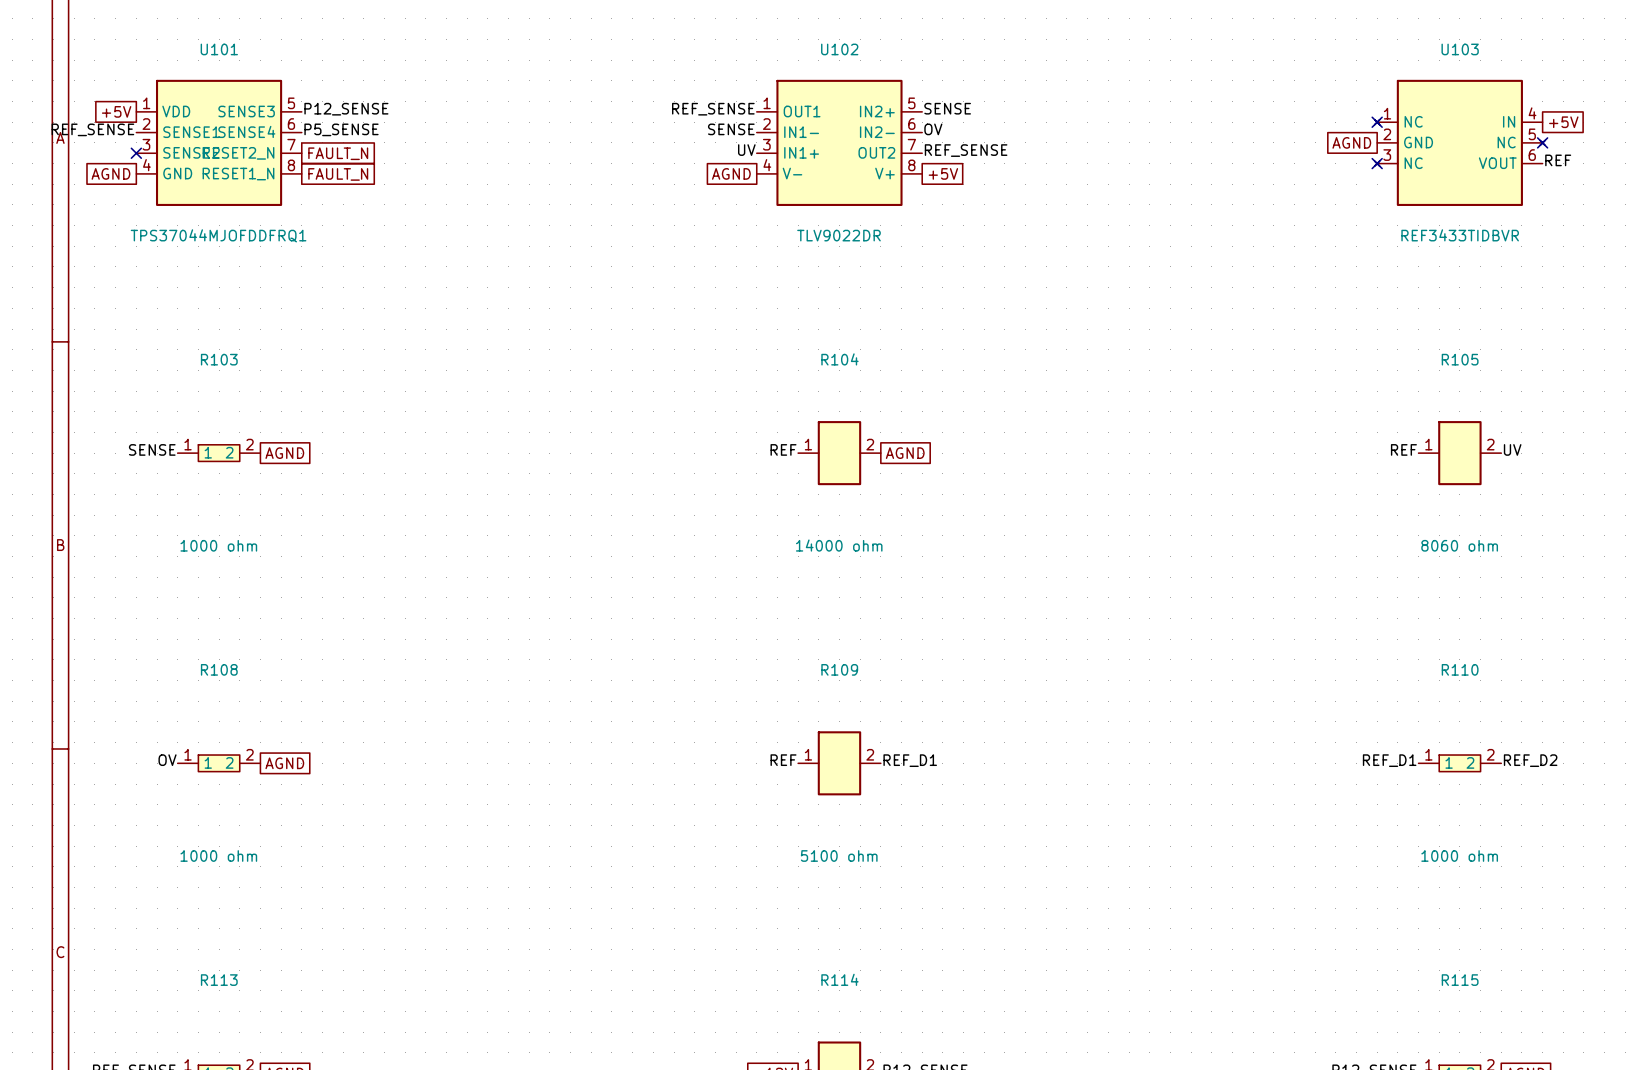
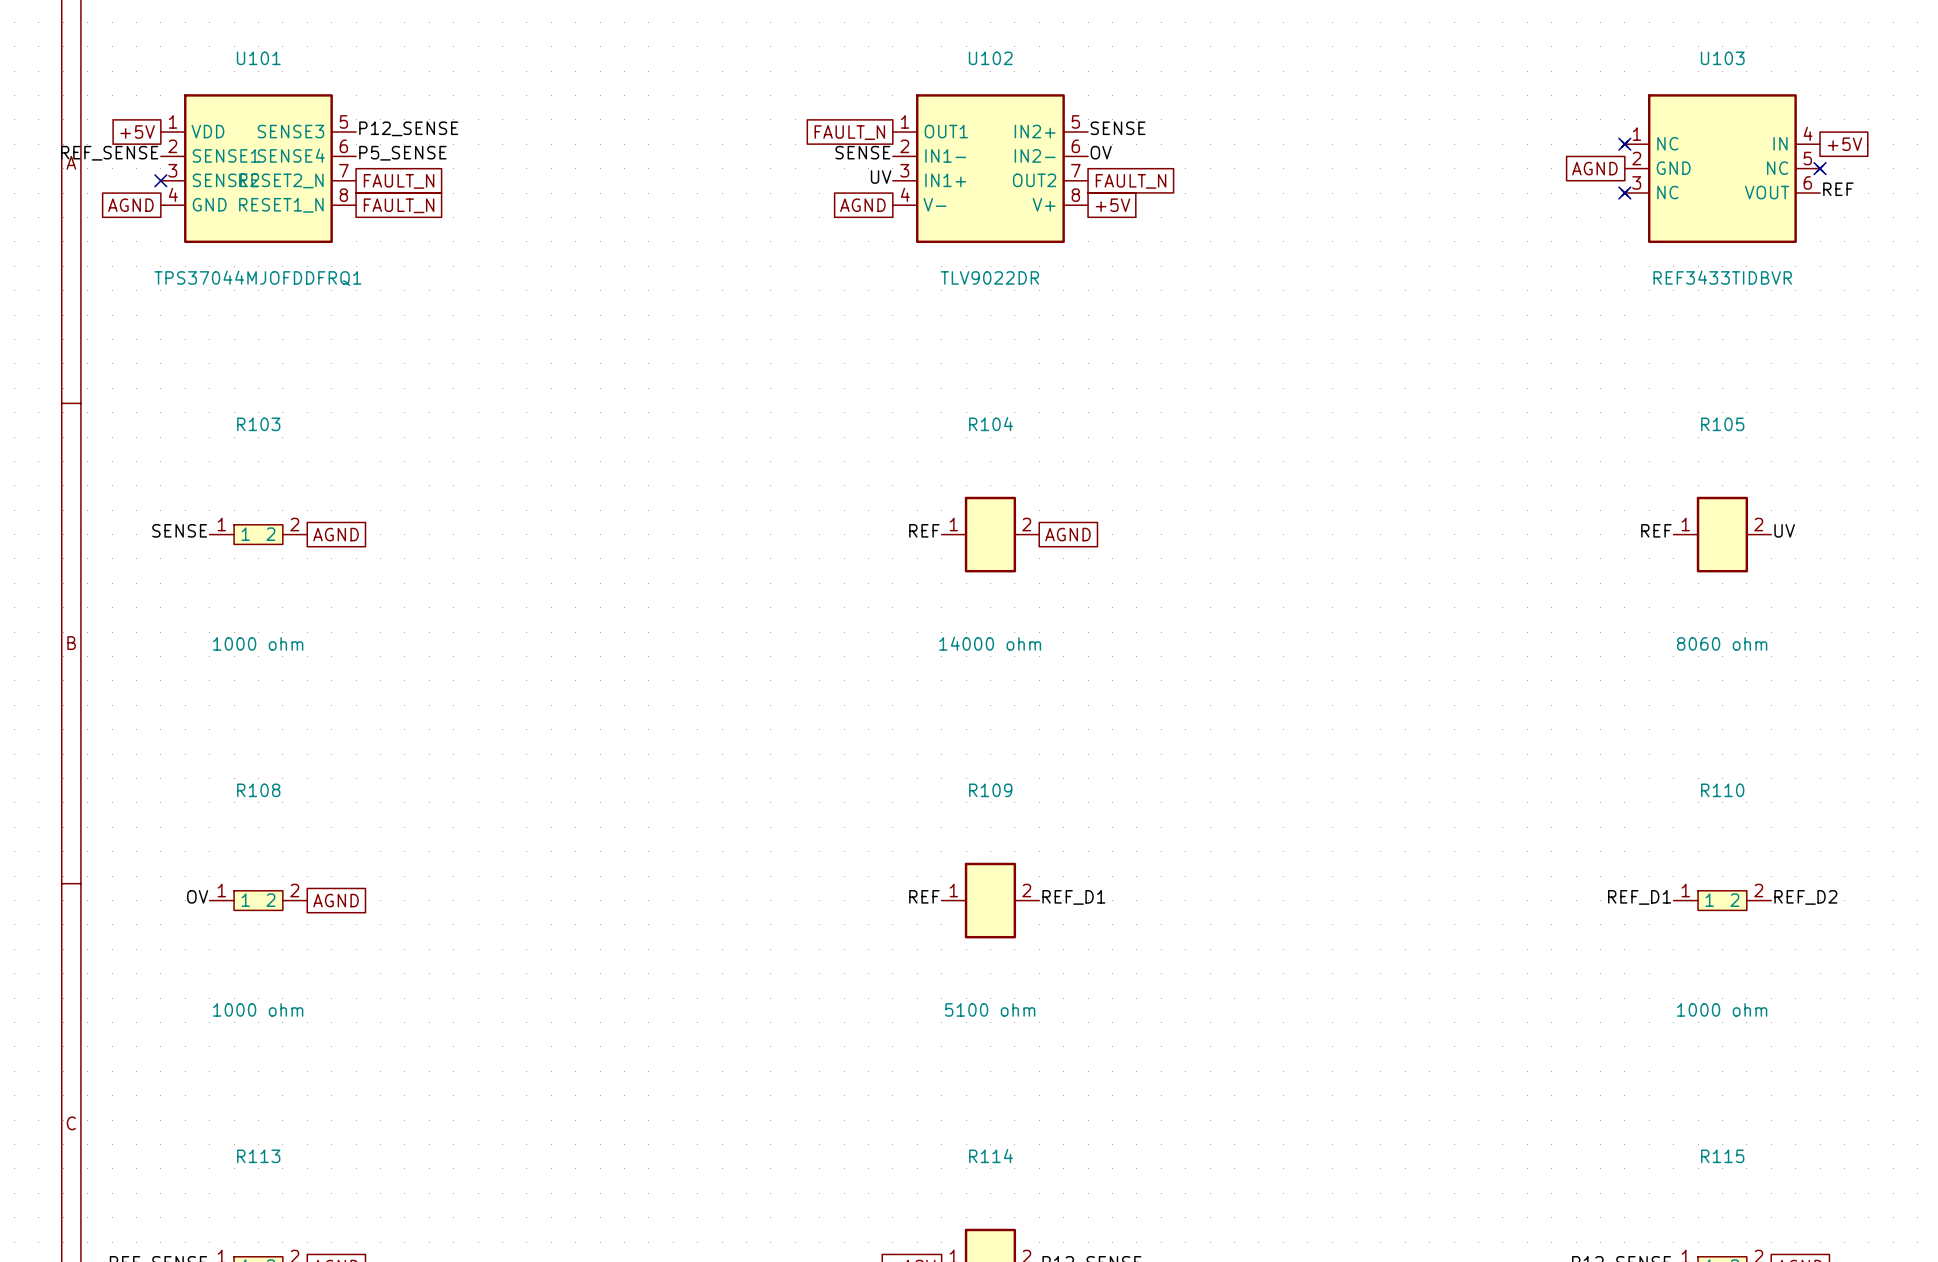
label: REF_SENSE (713, 109) -> none
global label: none -> FAULT_N (849, 132)
label: REF_SENSE (966, 150) -> none
global label: none -> FAULT_N (1131, 181)

